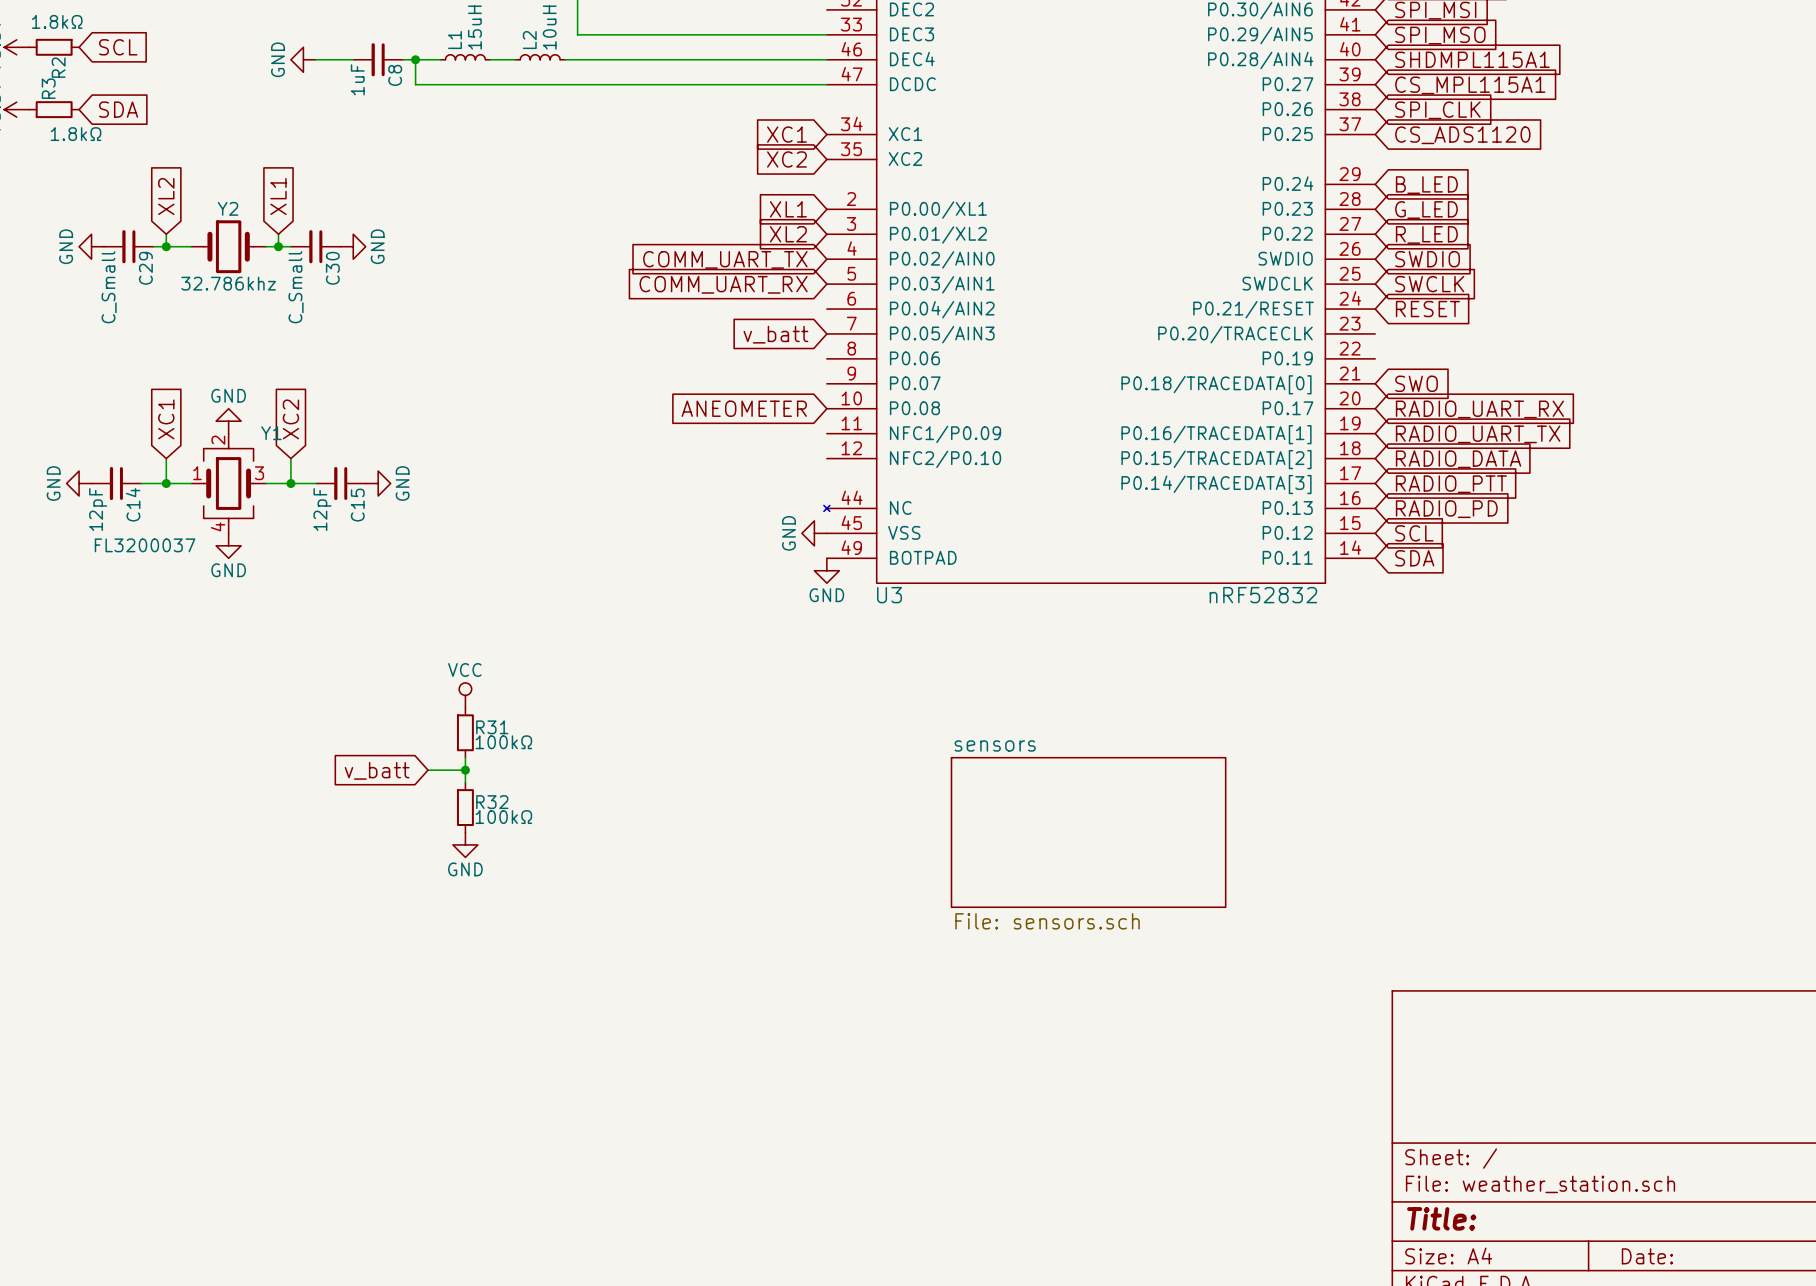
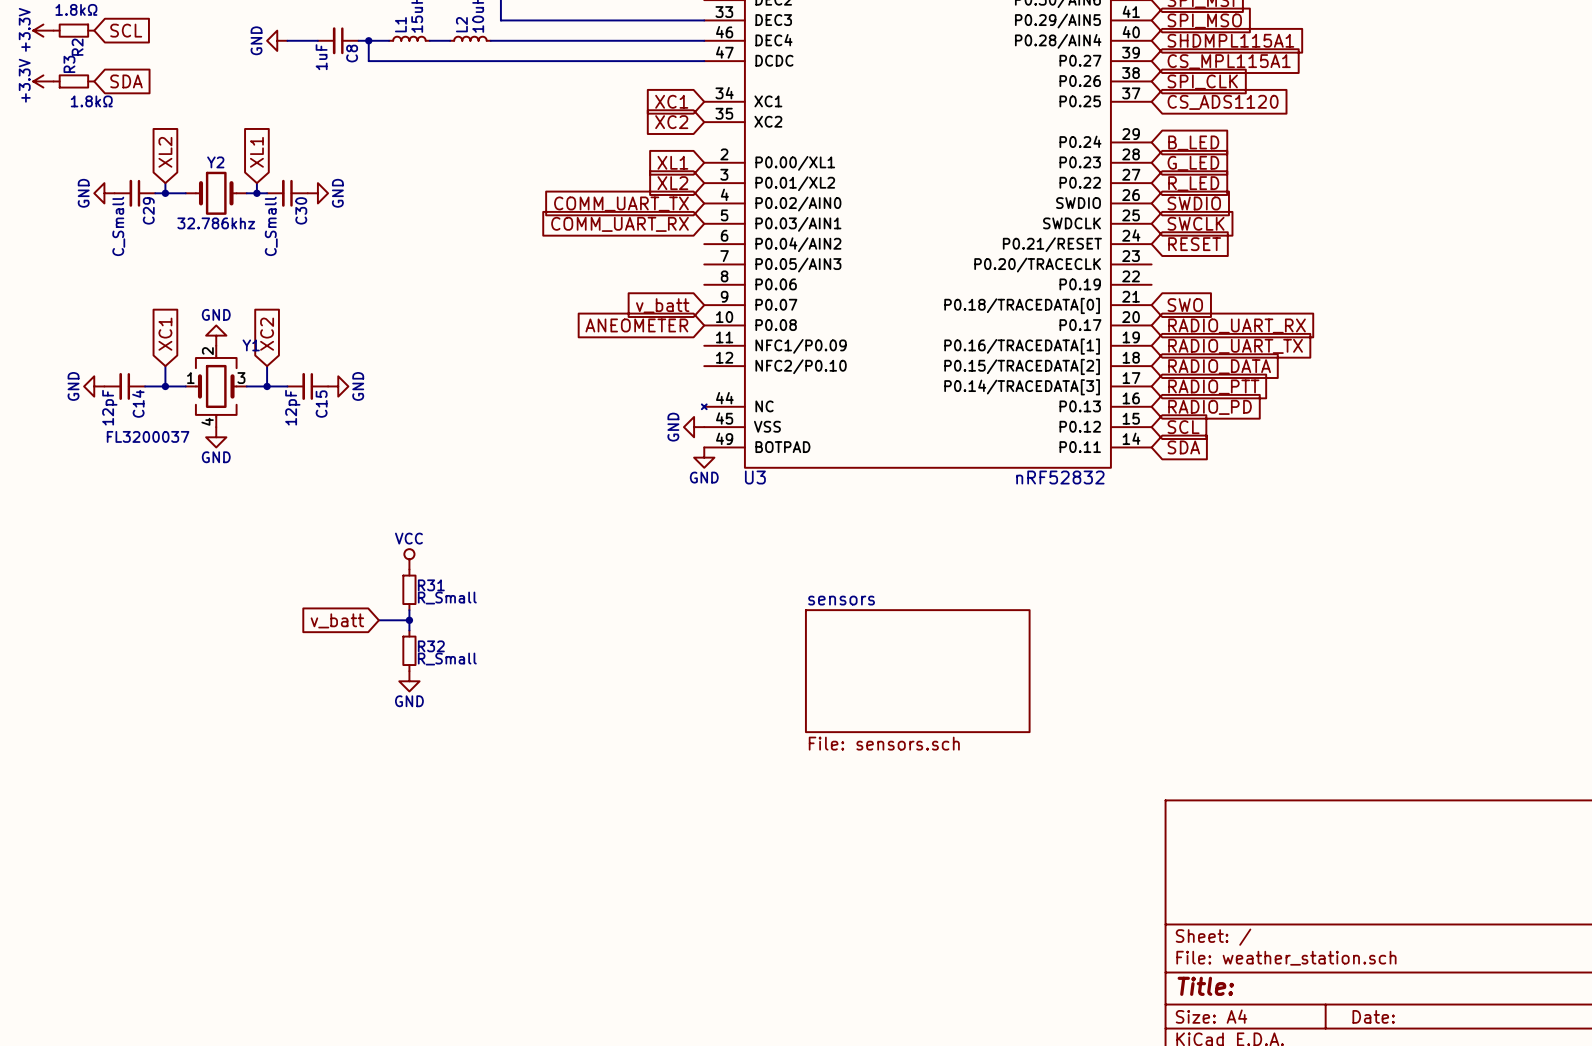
global label position: v_batt (775, 334) -> v_batt (662, 305)
R31 value: 100kΩ (503, 742) -> R_Small (447, 598)
R32 value: 100kΩ (503, 817) -> R_Small (447, 659)

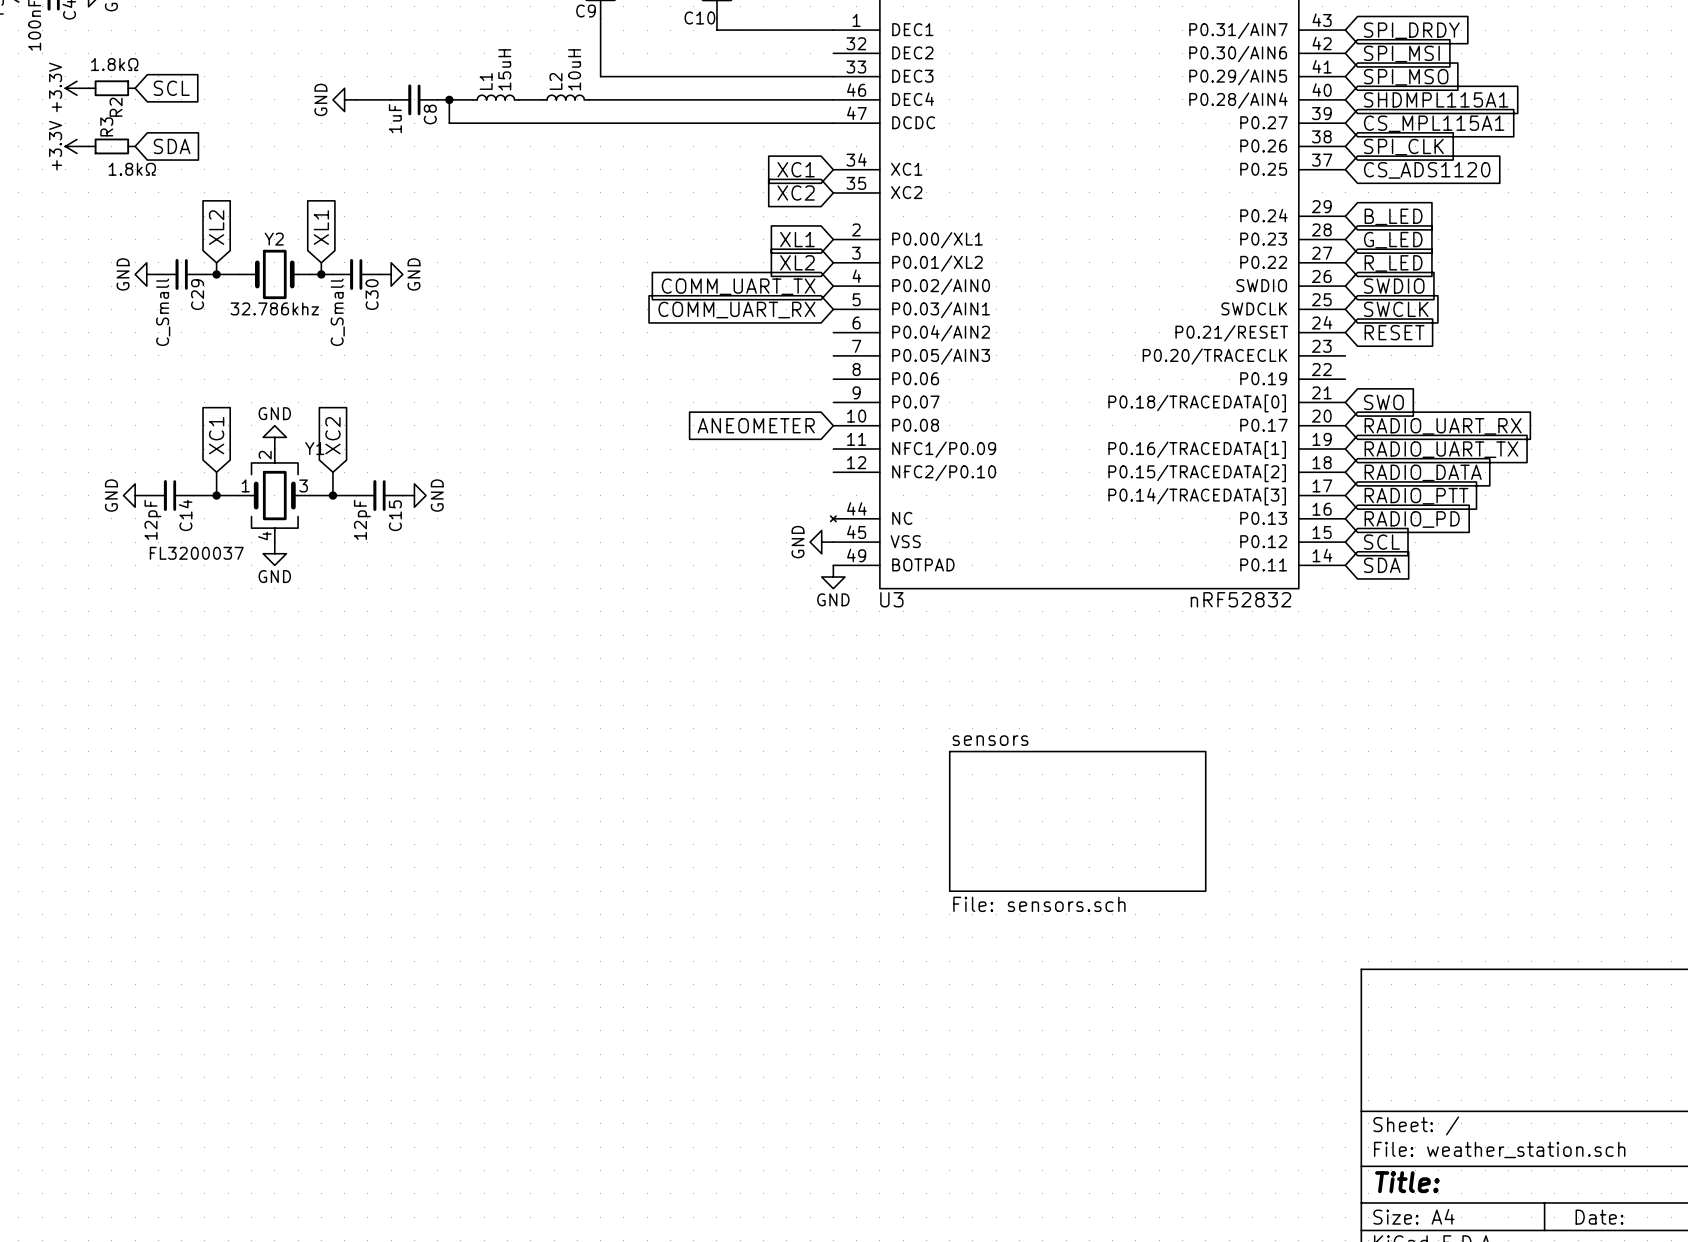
global label: v_batt (662, 305) -> none
power symbol: VCC (409, 559) -> none
R31: R_Small (409, 589) -> none
wire: (409, 610) (409, 630) -> none
global label: v_batt (337, 620) -> none
wire: (378, 620) (409, 620) -> none
junction: (409, 620) -> none
R32: R_Small (409, 650) -> none
power symbol: GND (409, 681) -> none

